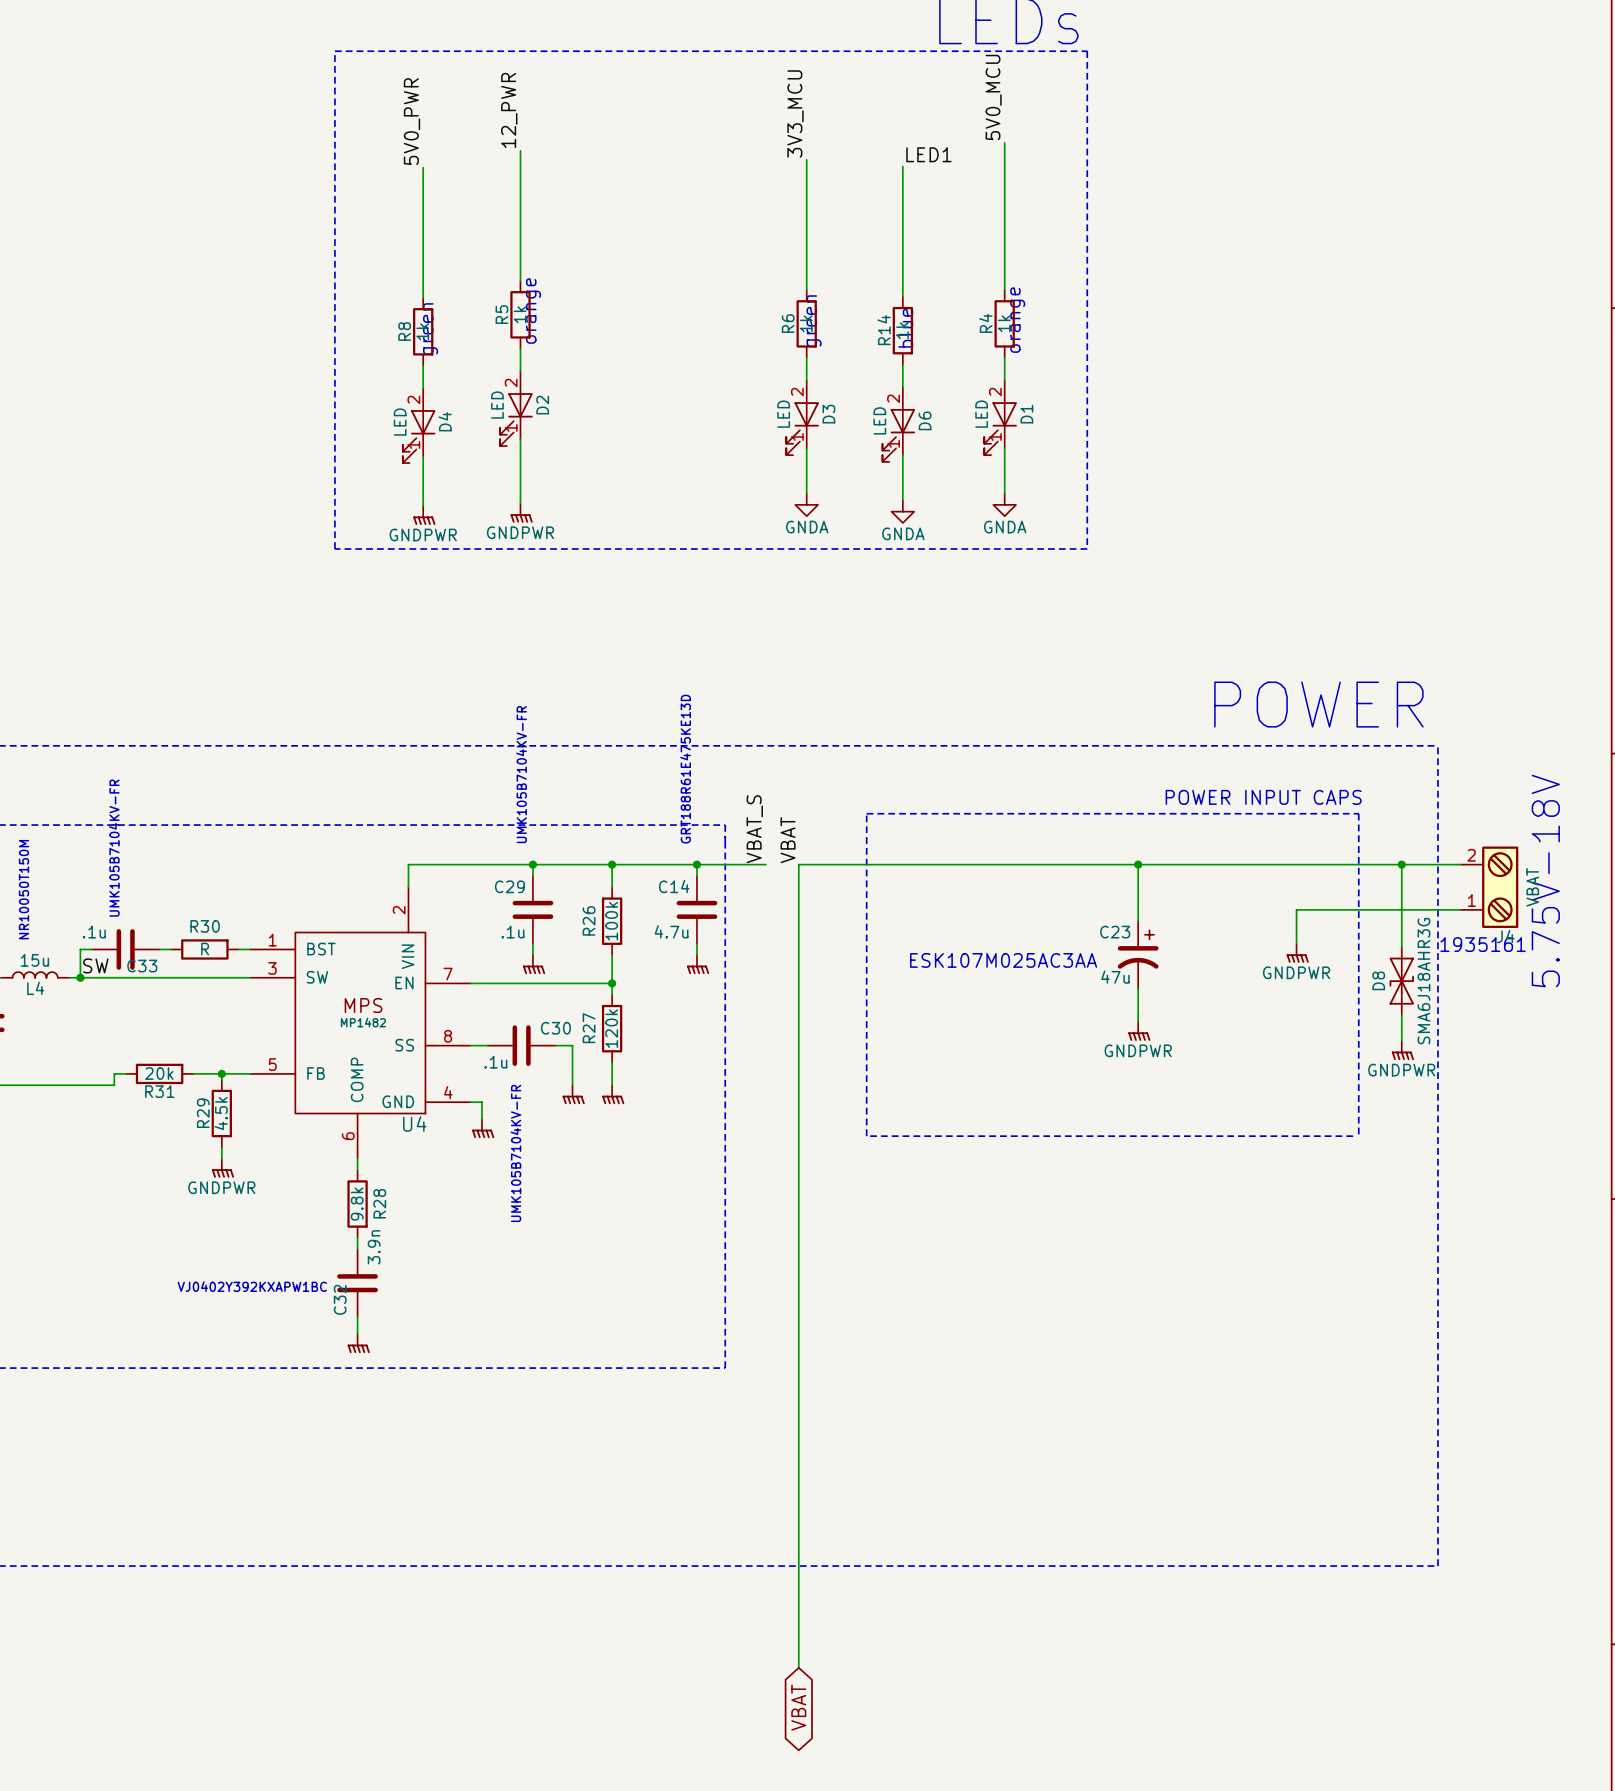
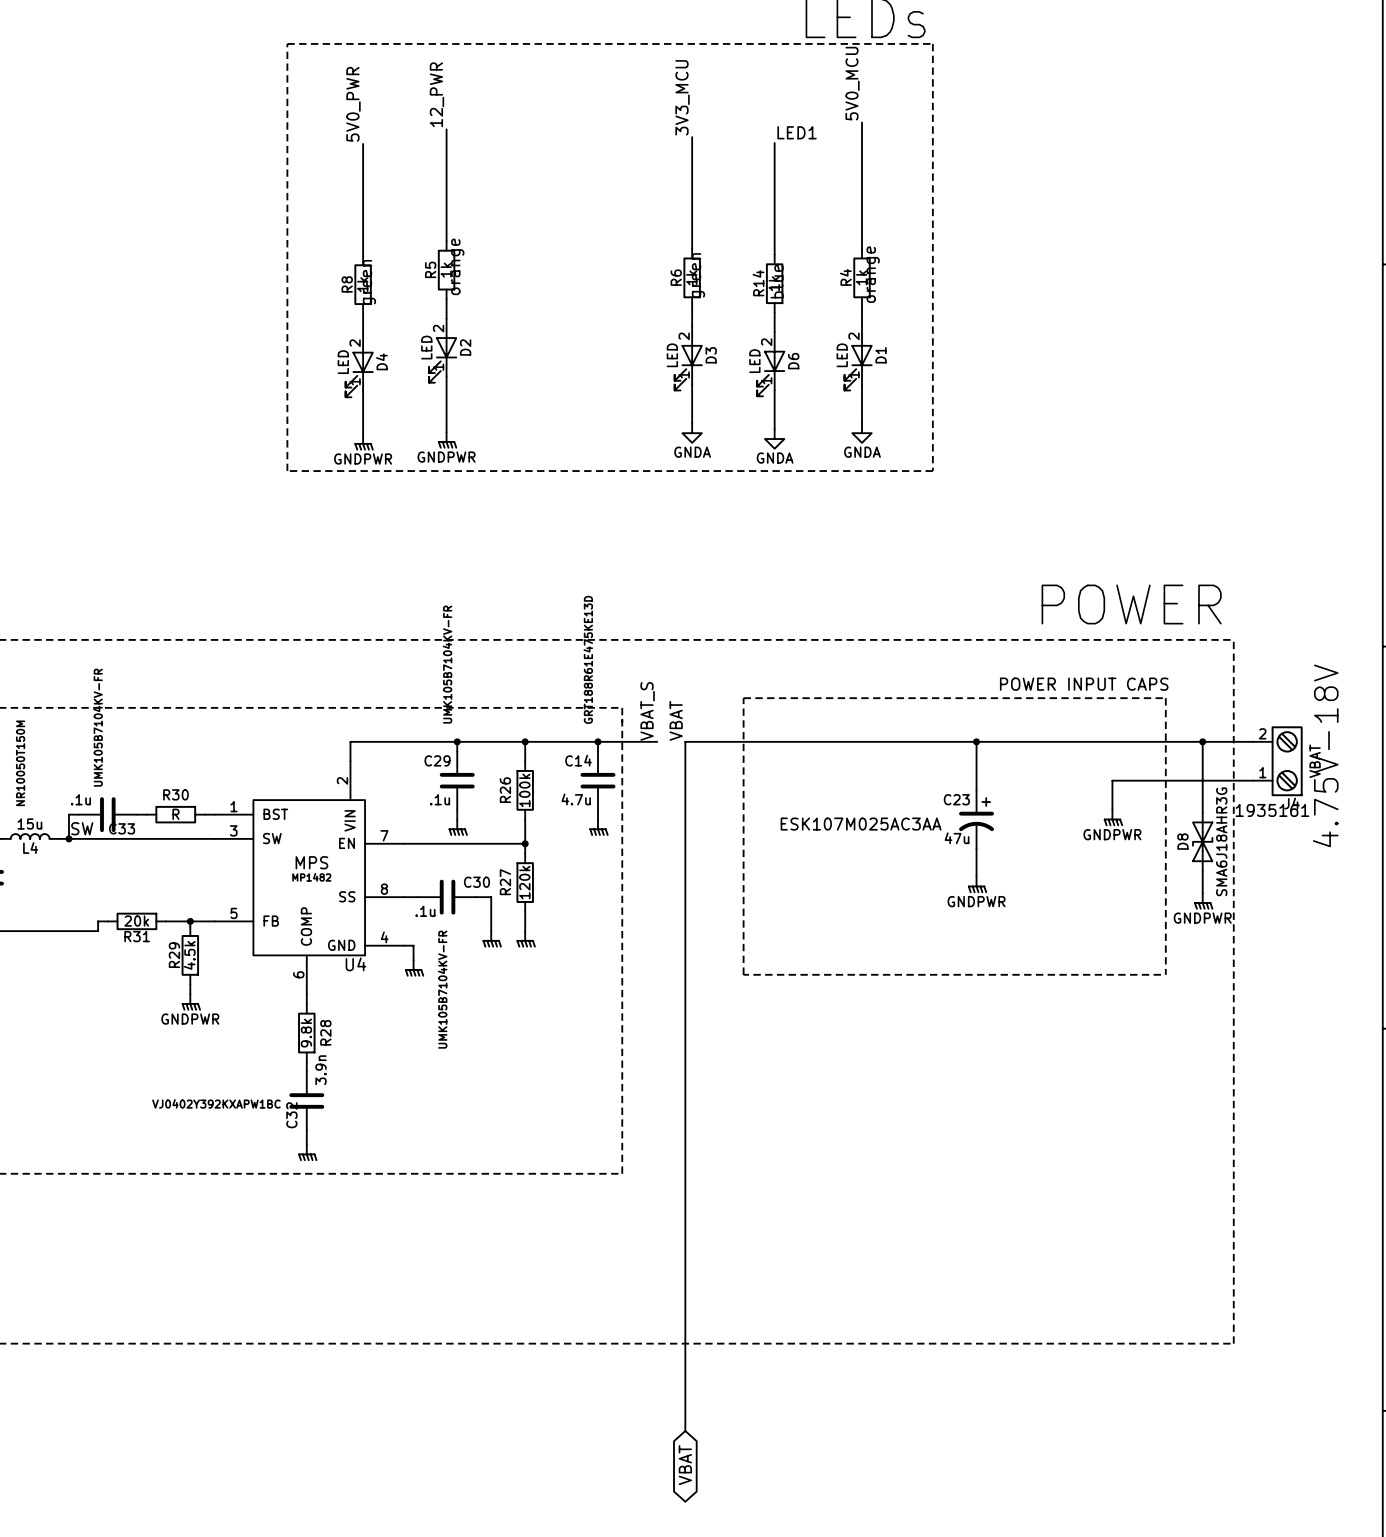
text: 5.75V-18V (1545, 881) -> 4.75V-18V (1325, 755)

